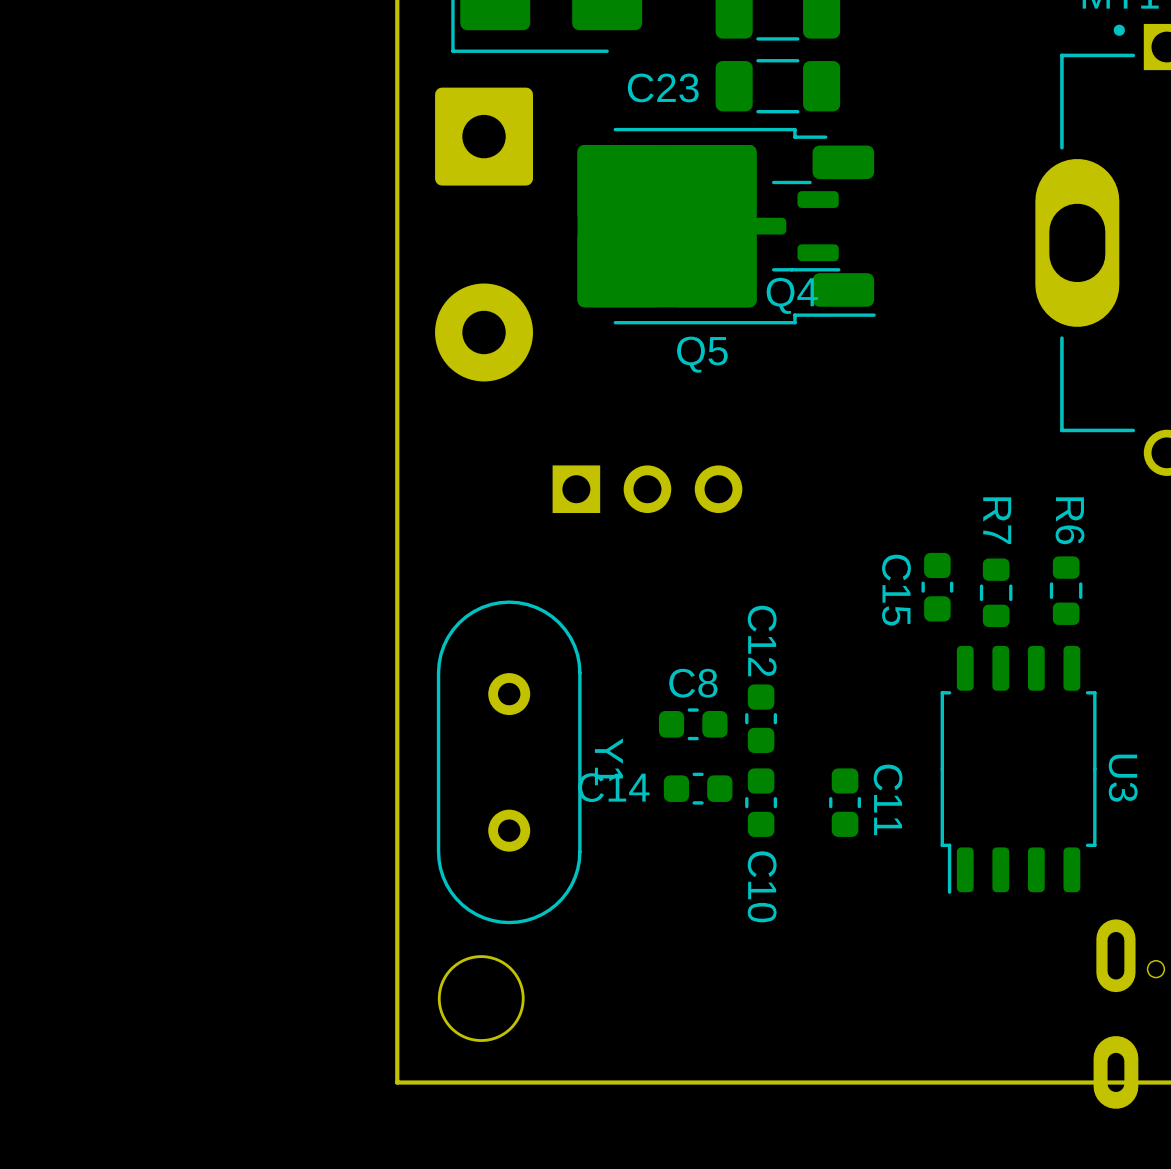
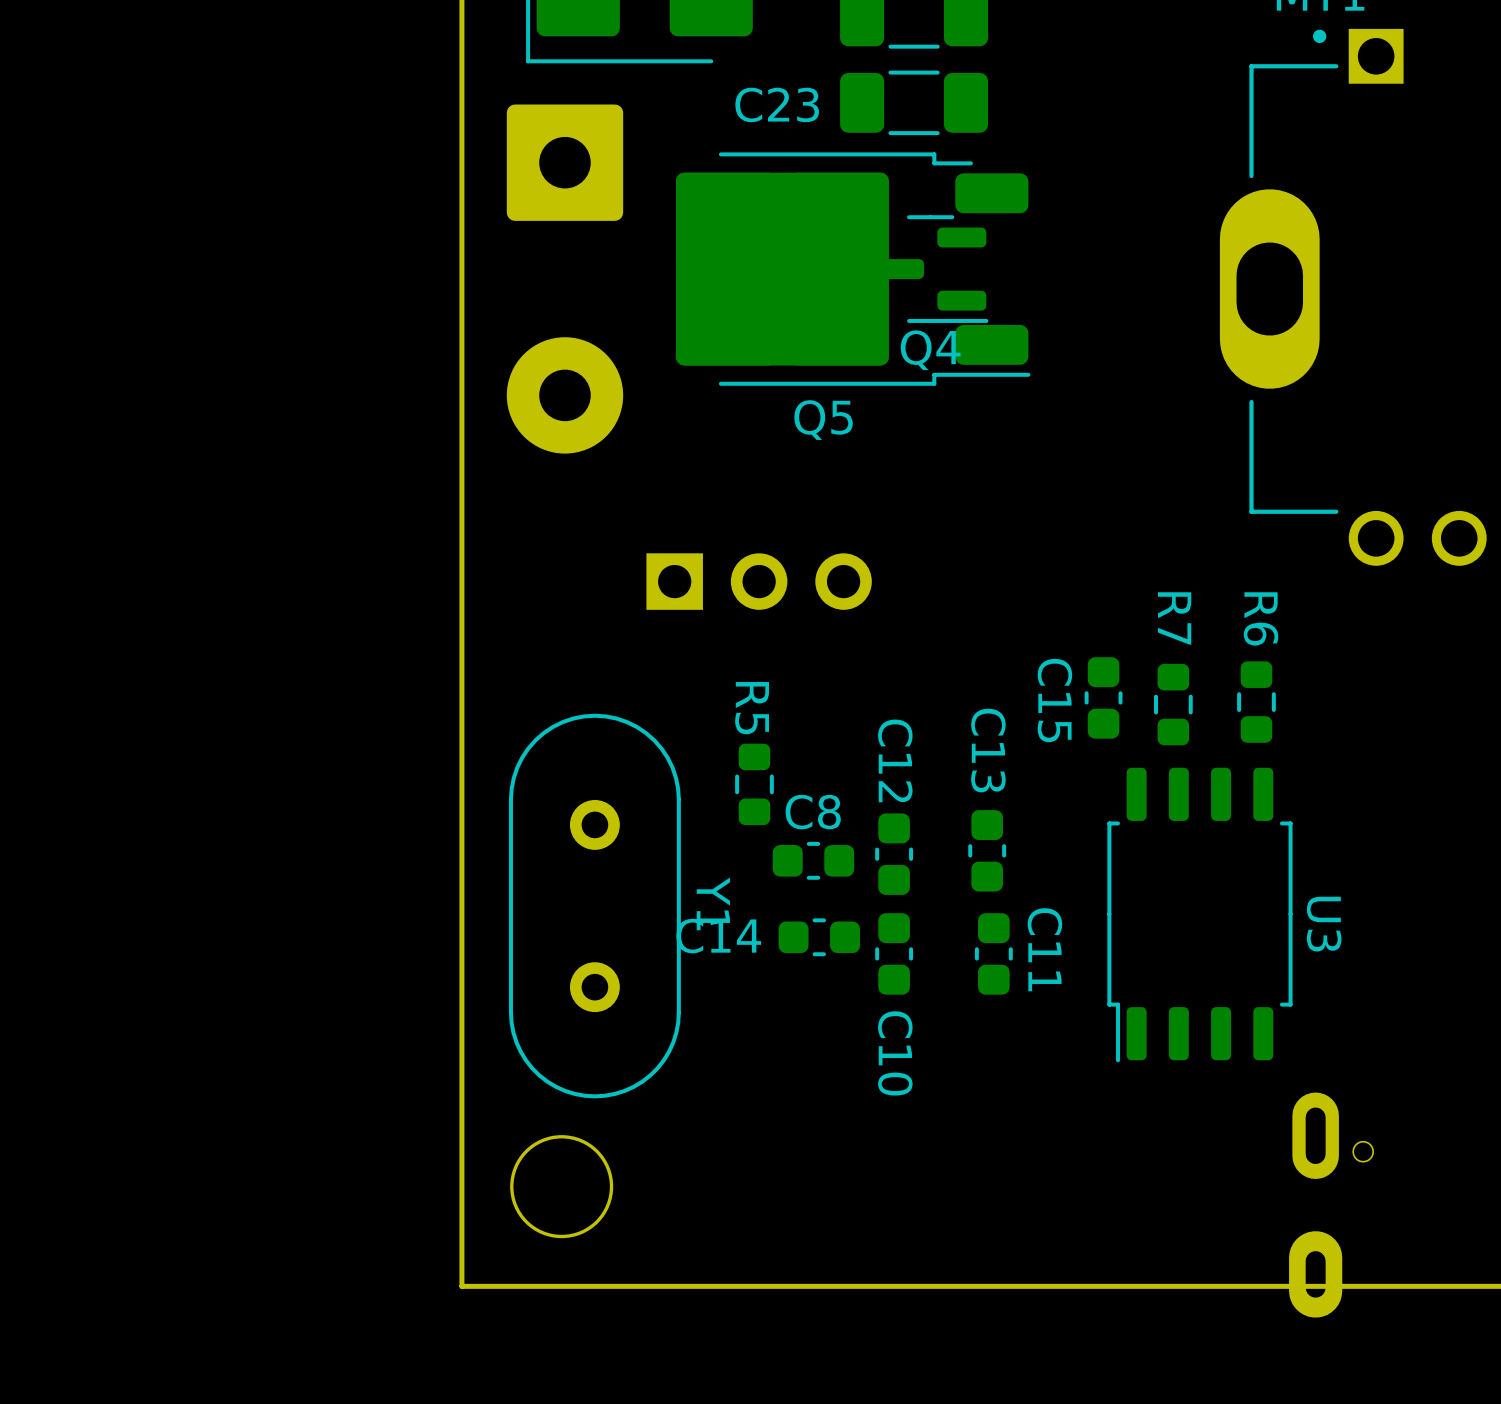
R5: none -> (754, 784)
C13: none -> (987, 850)

